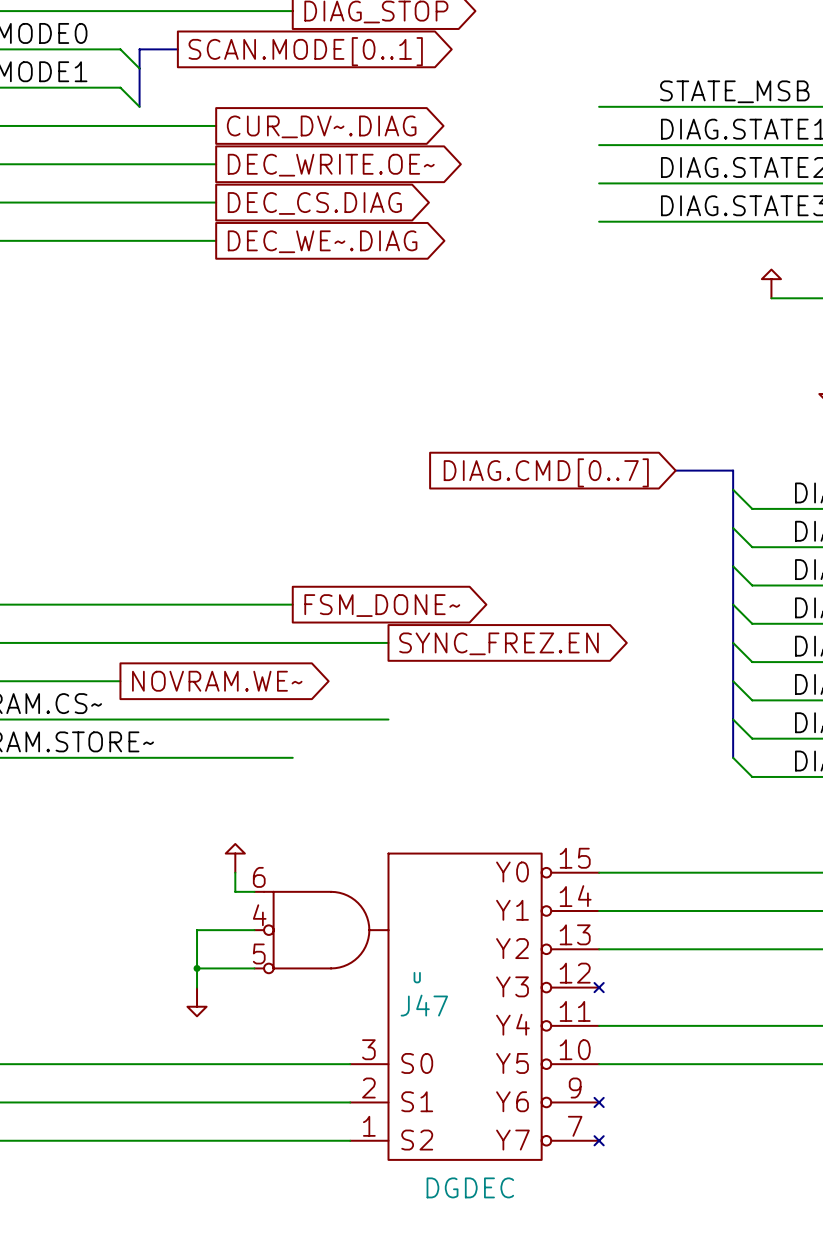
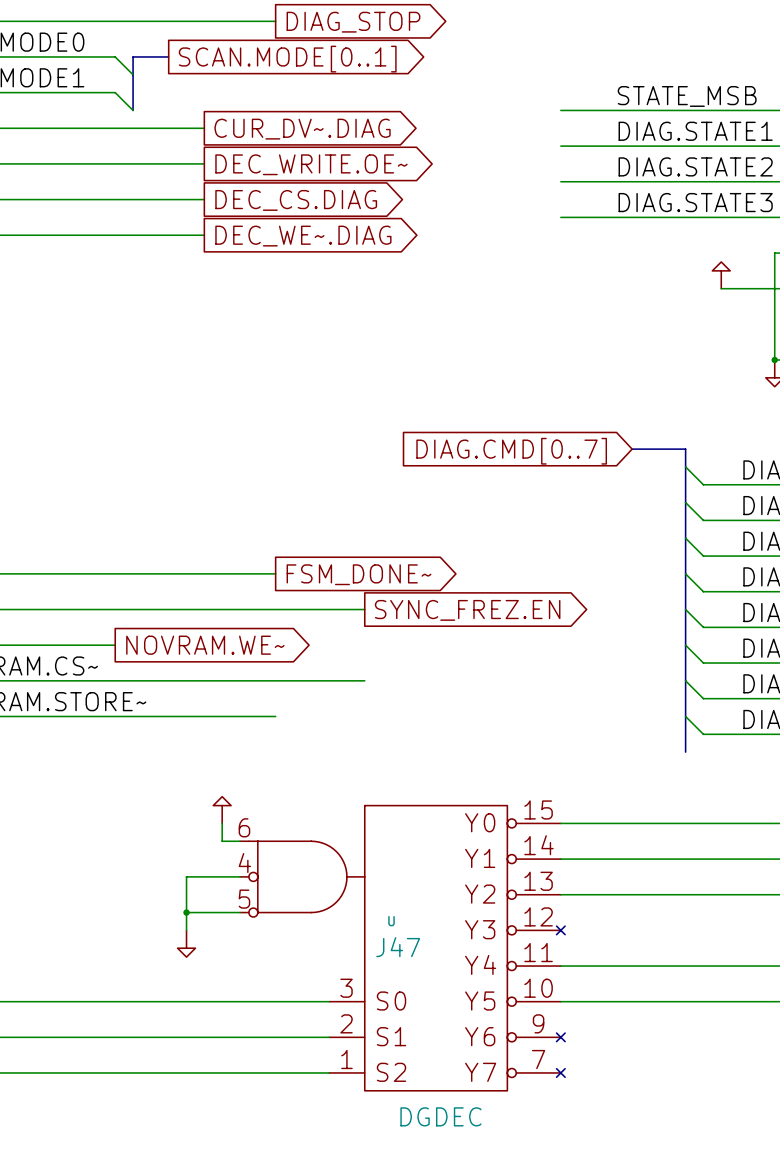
bus: none -> (685, 716) (685, 752)

